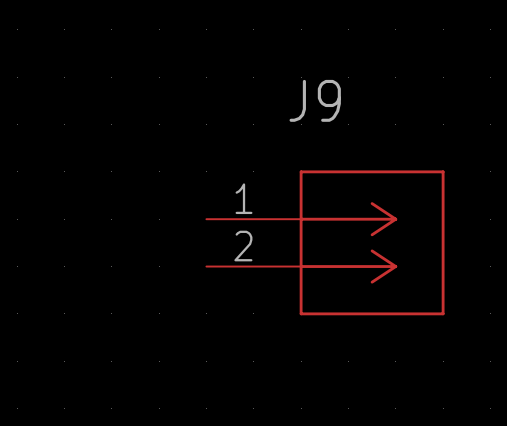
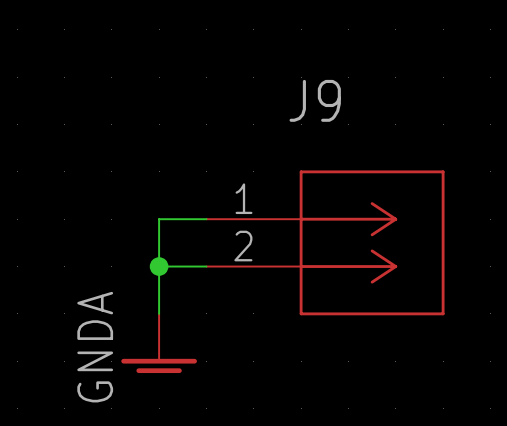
wire: none -> (206, 219) (159, 219) (159, 313)
wire: none -> (159, 266) (206, 266)
junction: none -> (159, 266)
power symbol: none -> GNDA (159, 343)

